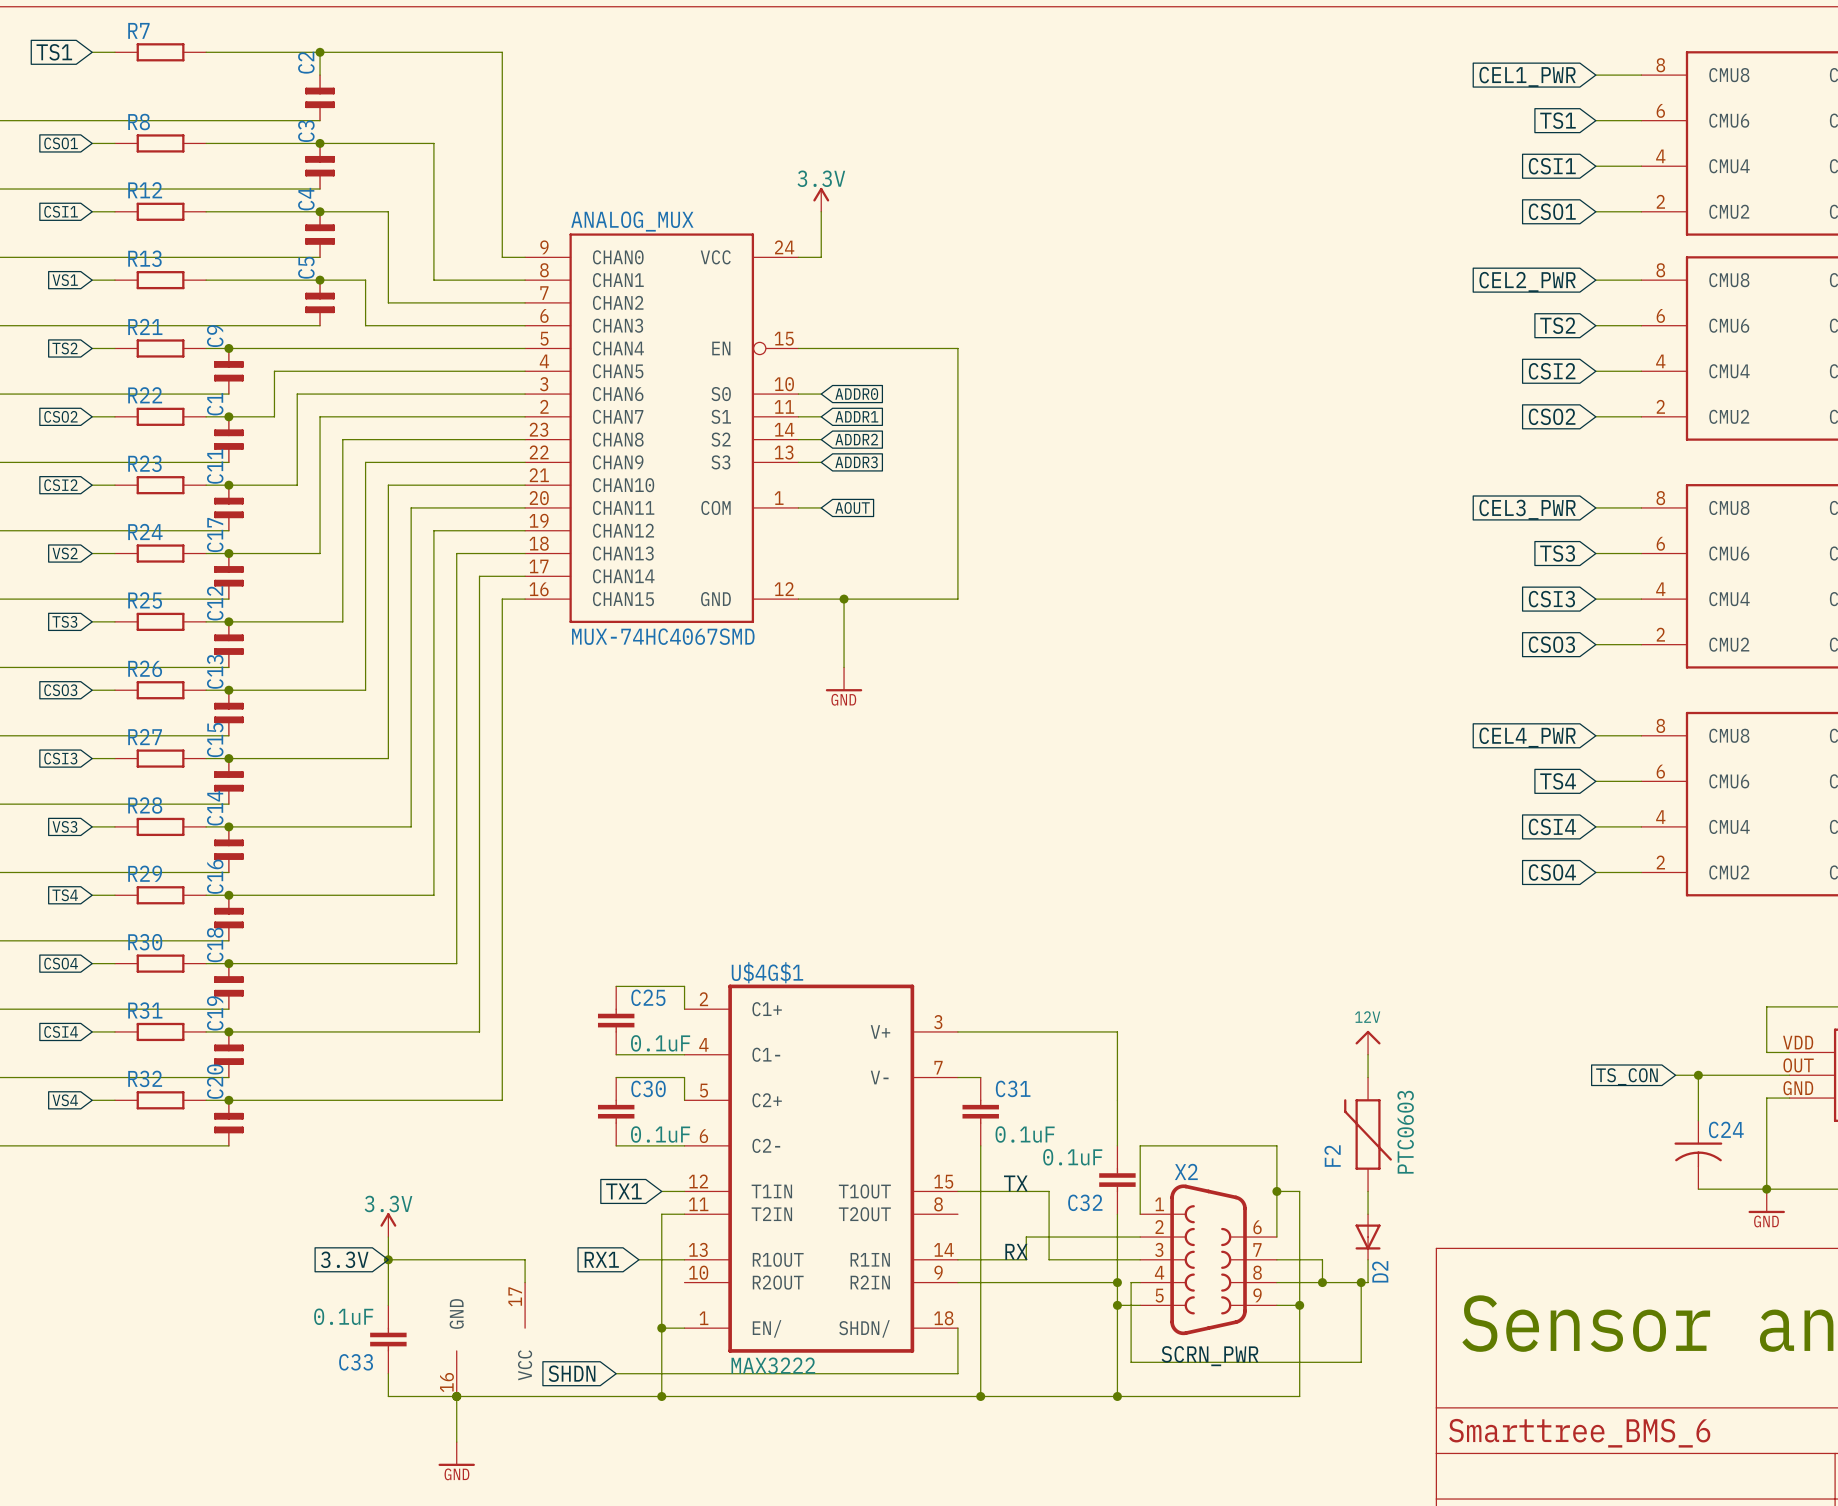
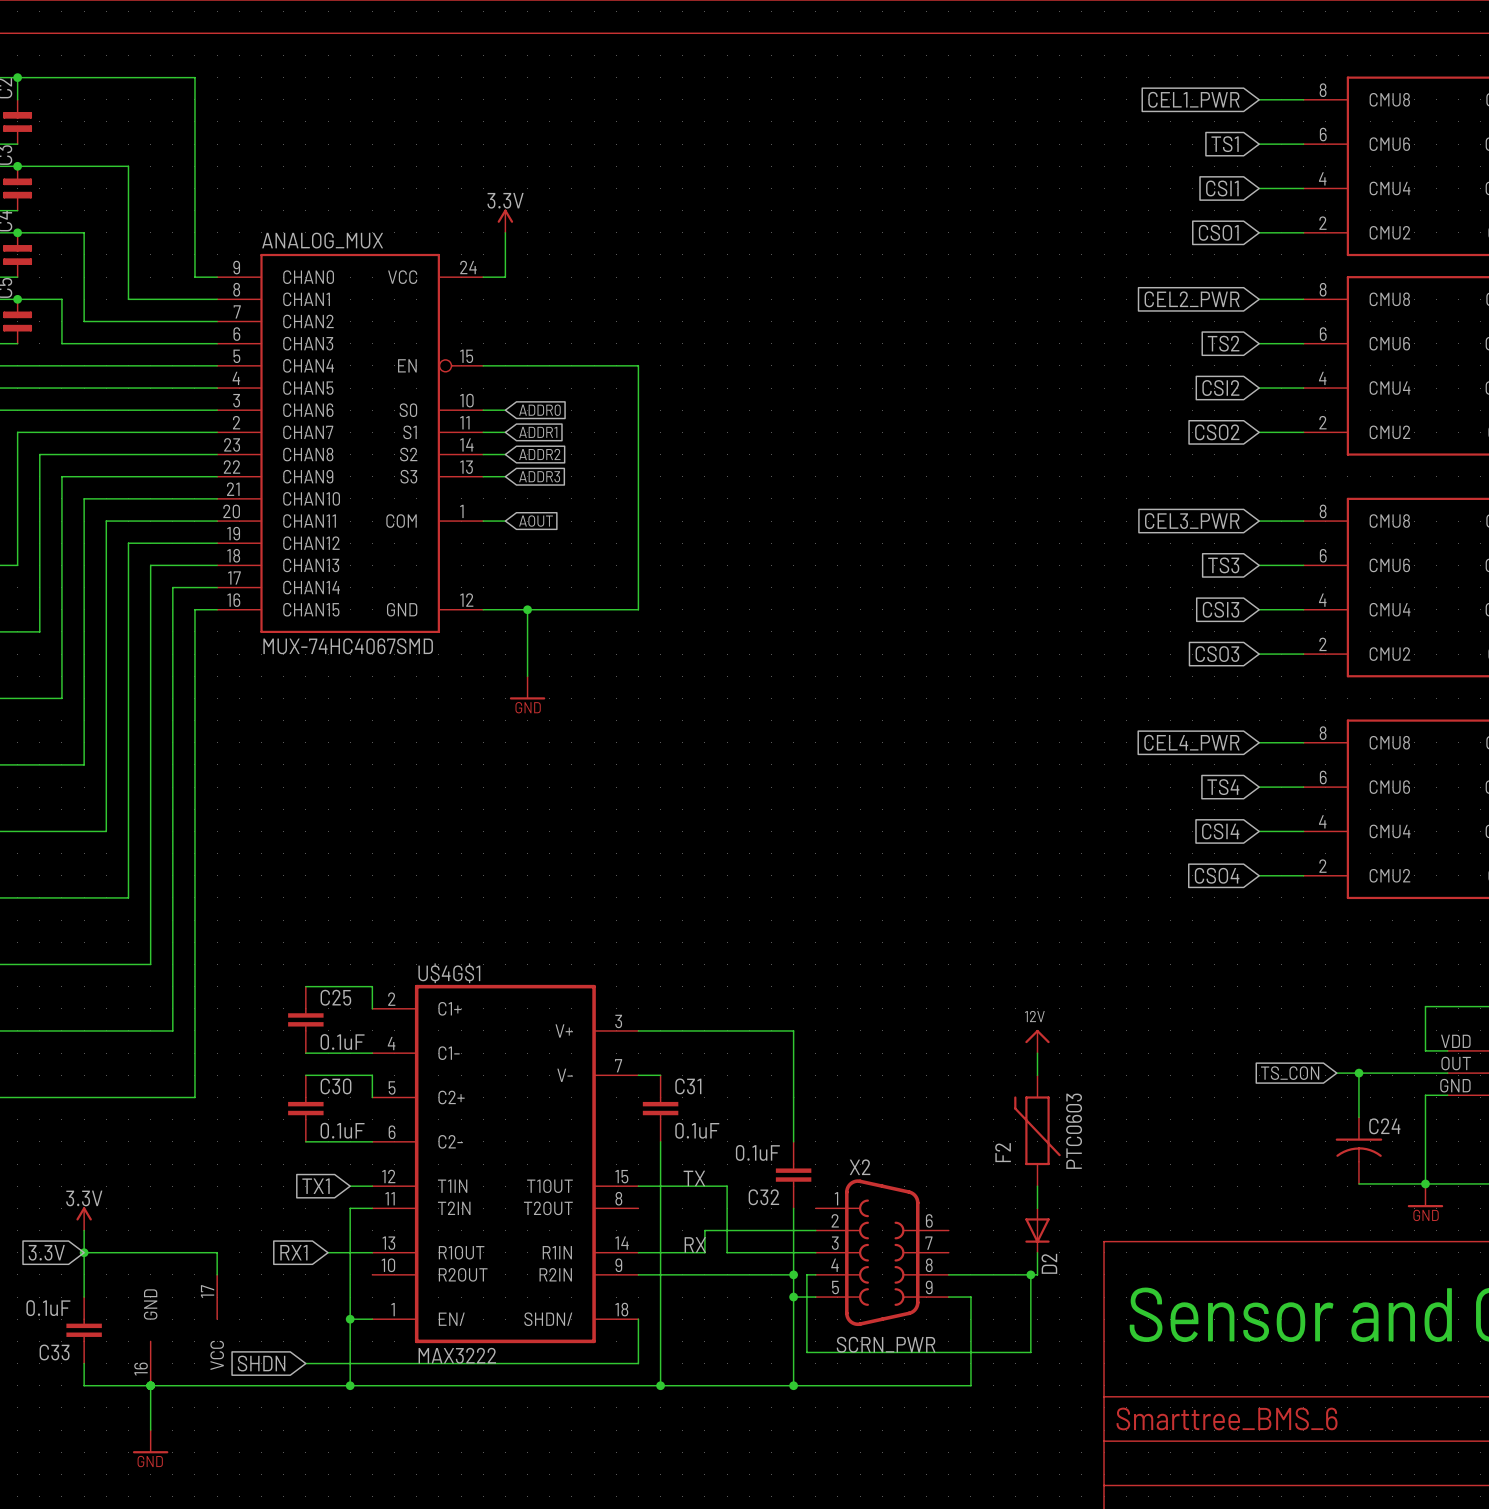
wire: (1276, 1191) (1299, 1191) (1299, 1305) -> none
junction: (1276, 1191) -> none
wire: (1140, 1214) (1140, 1145) (1276, 1145) (1276, 1237) -> none
wire: (1276, 1259) (1322, 1259) (1322, 1282) -> none
junction: (1322, 1282) -> none
junction: (1299, 1305) -> none

